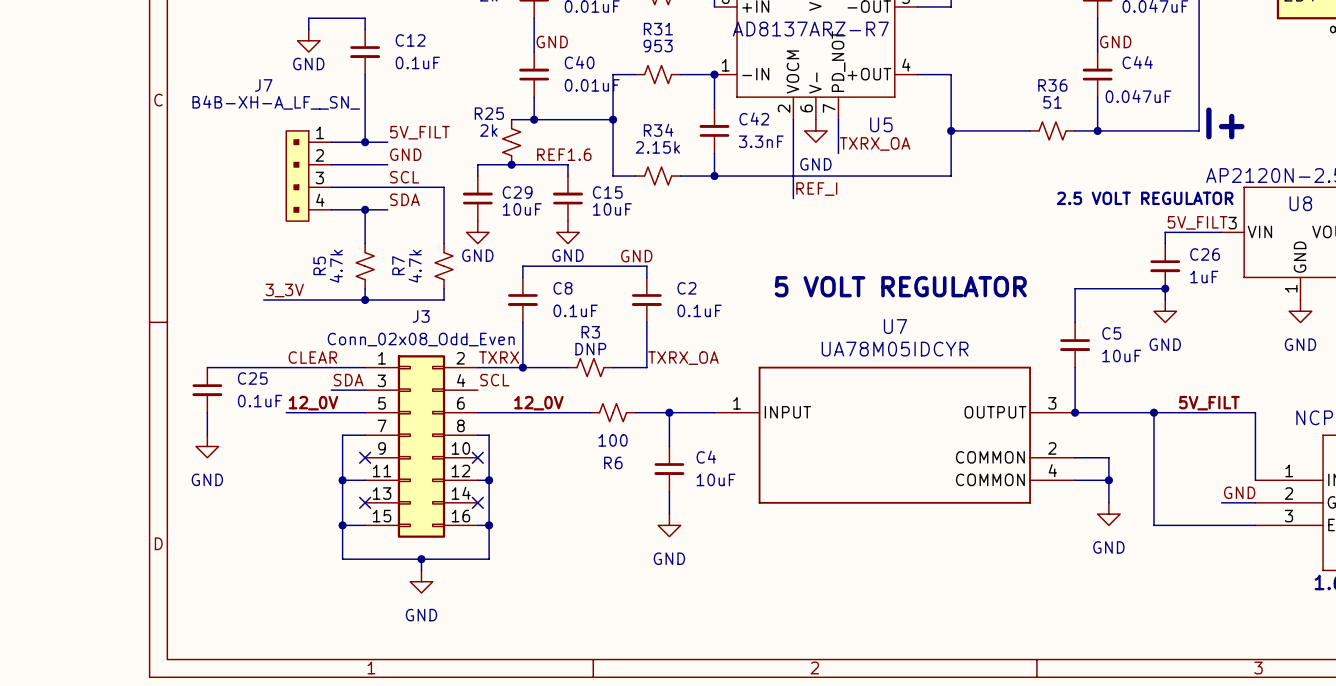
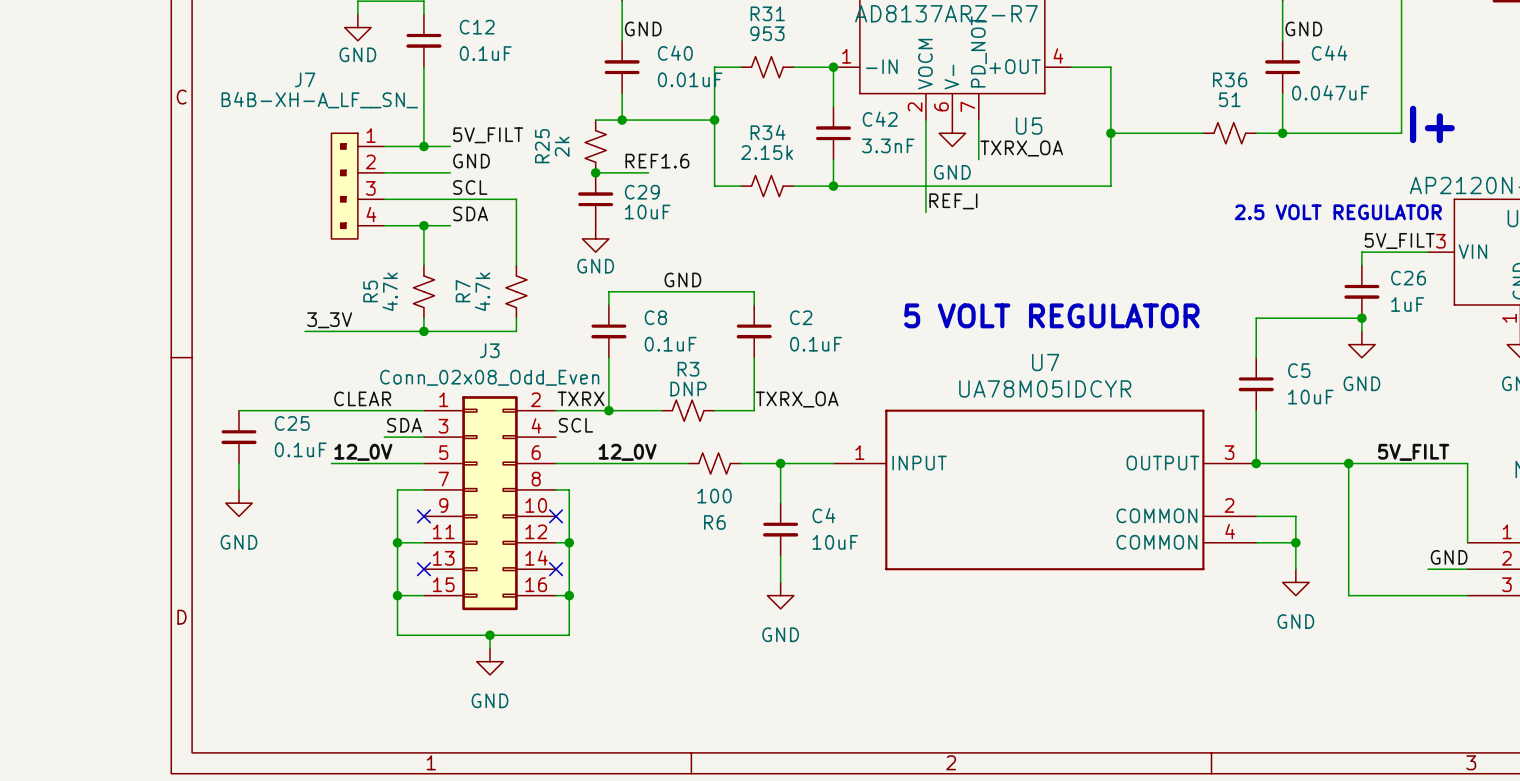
R25 name rotation: 0° (489, 113) -> 90° counterclockwise (542, 146)
R25 value rotation: 0° (488, 130) -> 90° counterclockwise (562, 146)
wire: (511, 164) (477, 164) (477, 176) -> none
wire: (556, 164) (567, 164) (567, 176) -> none
C29 position: (477, 198) -> (595, 199)
C15: 10uF (567, 198) -> none
power symbol: none -> GND (595, 238)
power symbol: GND (477, 232) -> none
power symbol: GND (567, 232) -> none
label position: GND (636, 256) -> GND (682, 279)

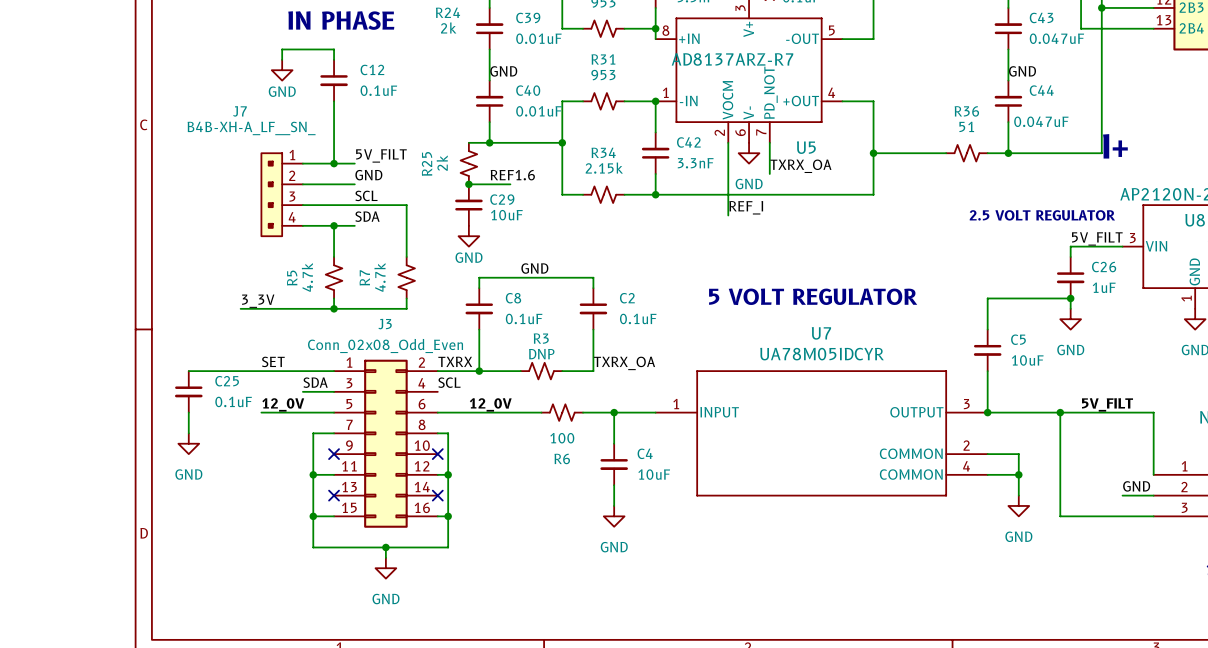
label: CLEAR (362, 398) -> SET (273, 361)

